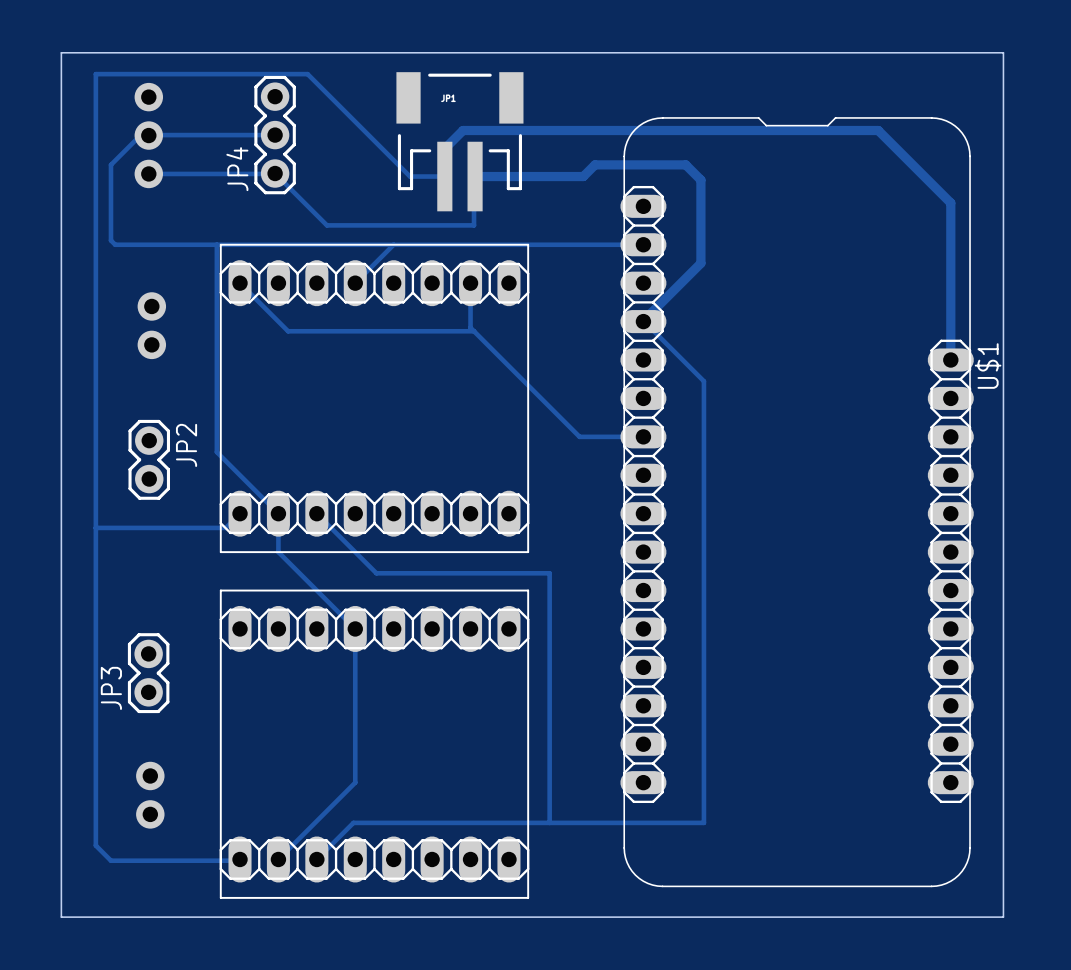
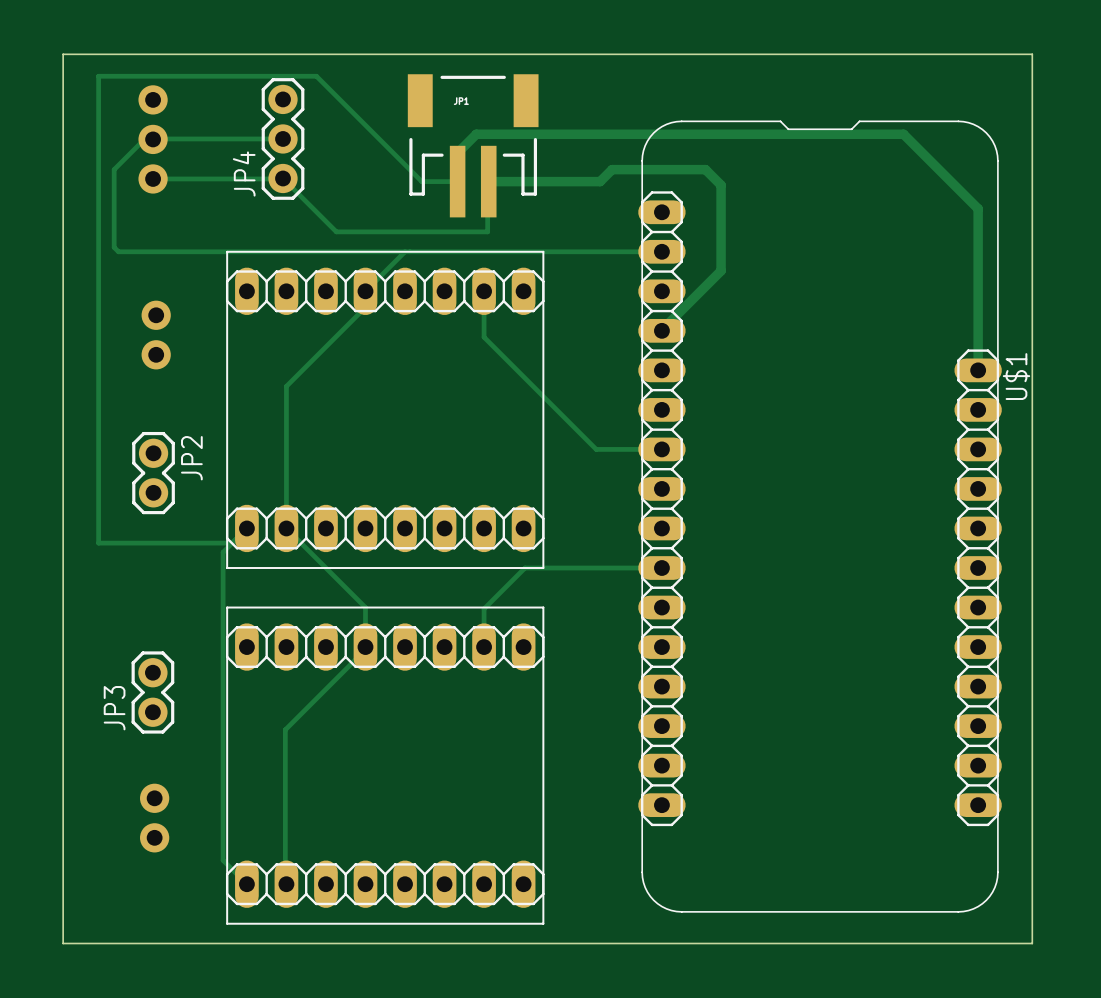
track: (216, 244) (216, 452) (278, 513) (278, 552) (355, 628) -> (365, 291) (365, 307) (286, 386) (286, 528) (365, 607) (365, 647)
track: (240, 283) (288, 331) (474, 331) -> none
track: (643, 320) (703, 381) (703, 822) (353, 822) (316, 859) -> none
track: (316, 513) (376, 573) (549, 573) (549, 822) -> none
track: (95, 527) (95, 845) (110, 860) (240, 859) -> (232, 543) (223, 552) (223, 860) (246, 884)
track: none -> (661, 568) (525, 568) (484, 608) (484, 647)
track: (355, 631) (355, 782) (278, 859) -> (365, 649) (285, 729) (285, 883)

